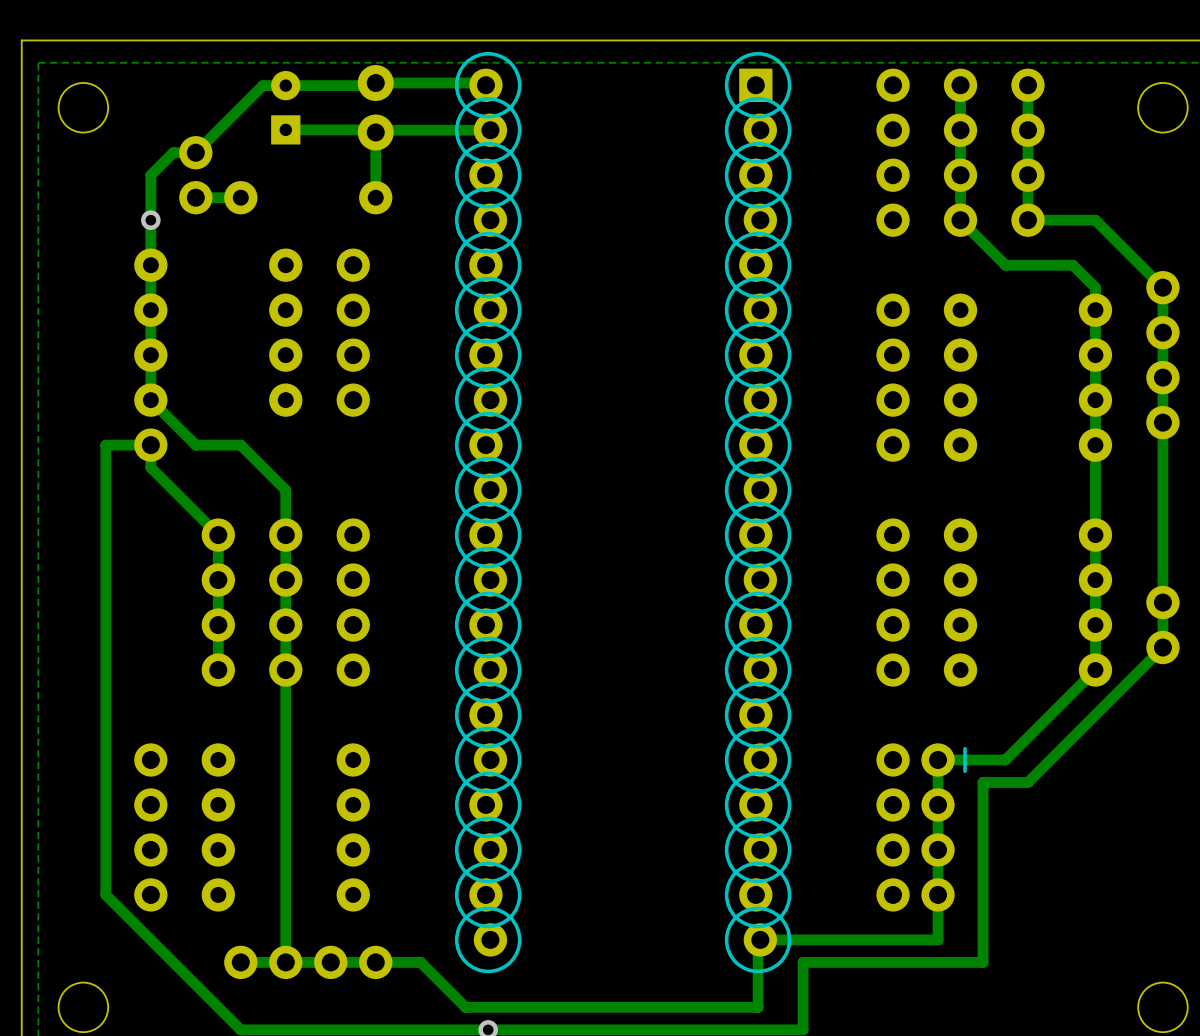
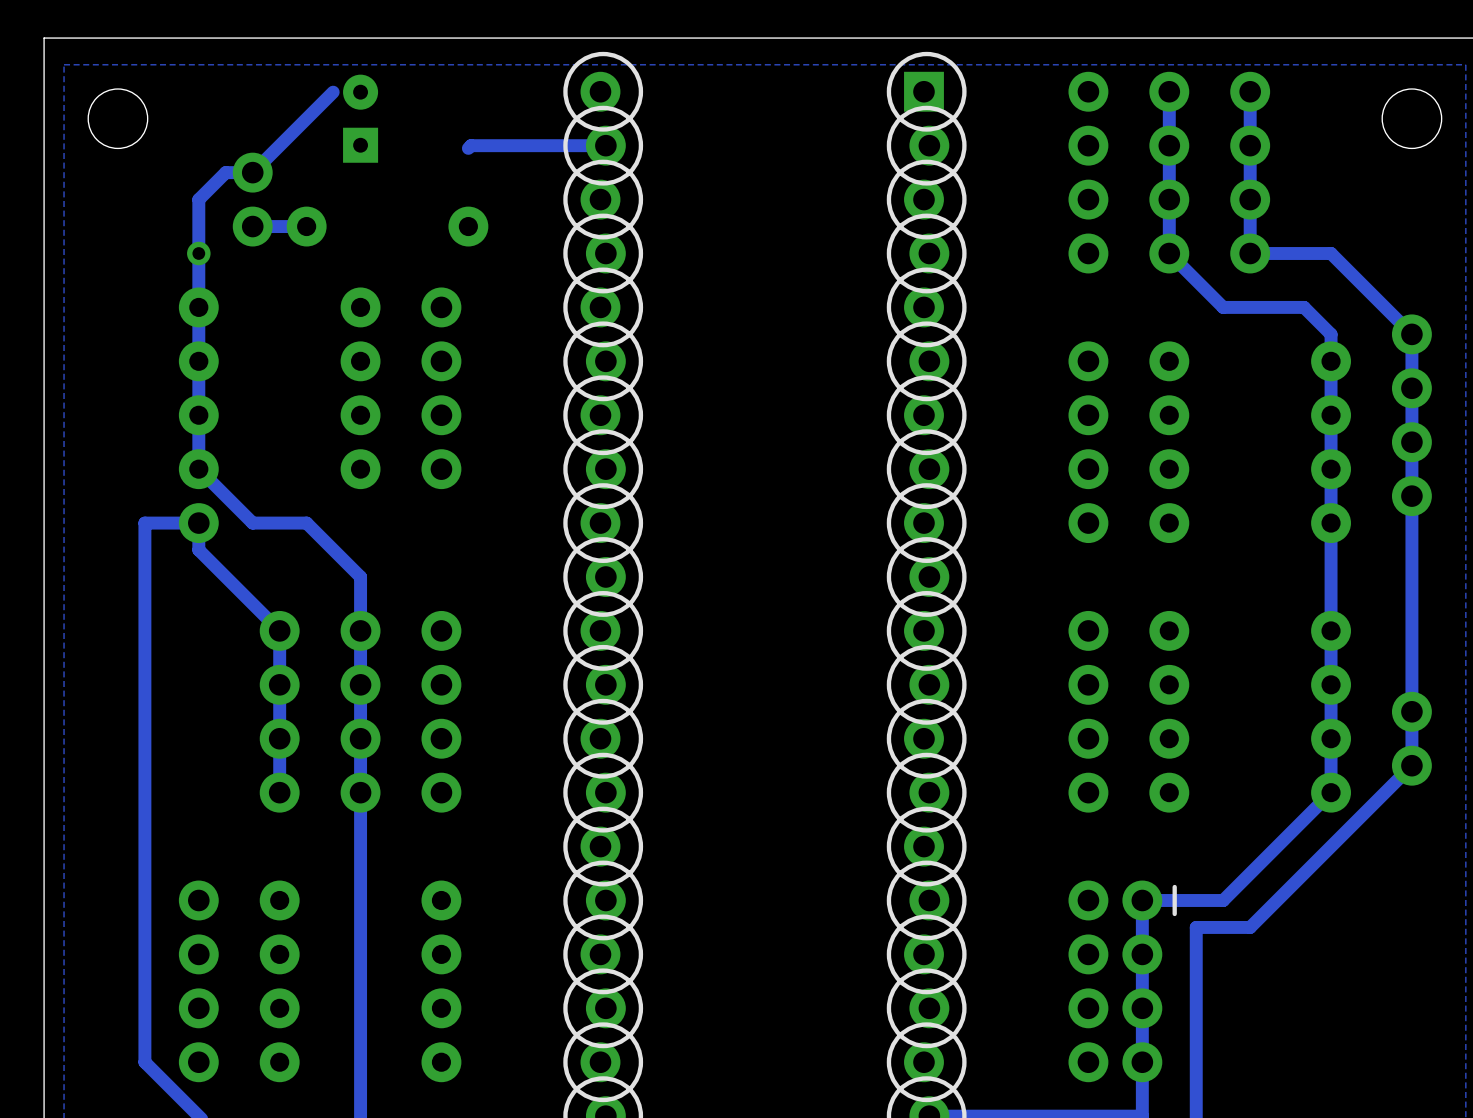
track: (483, 83) (262, 85) -> none
part: (375, 107) -> none
track: (285, 129) (373, 129) (375, 132) (375, 197) -> none

